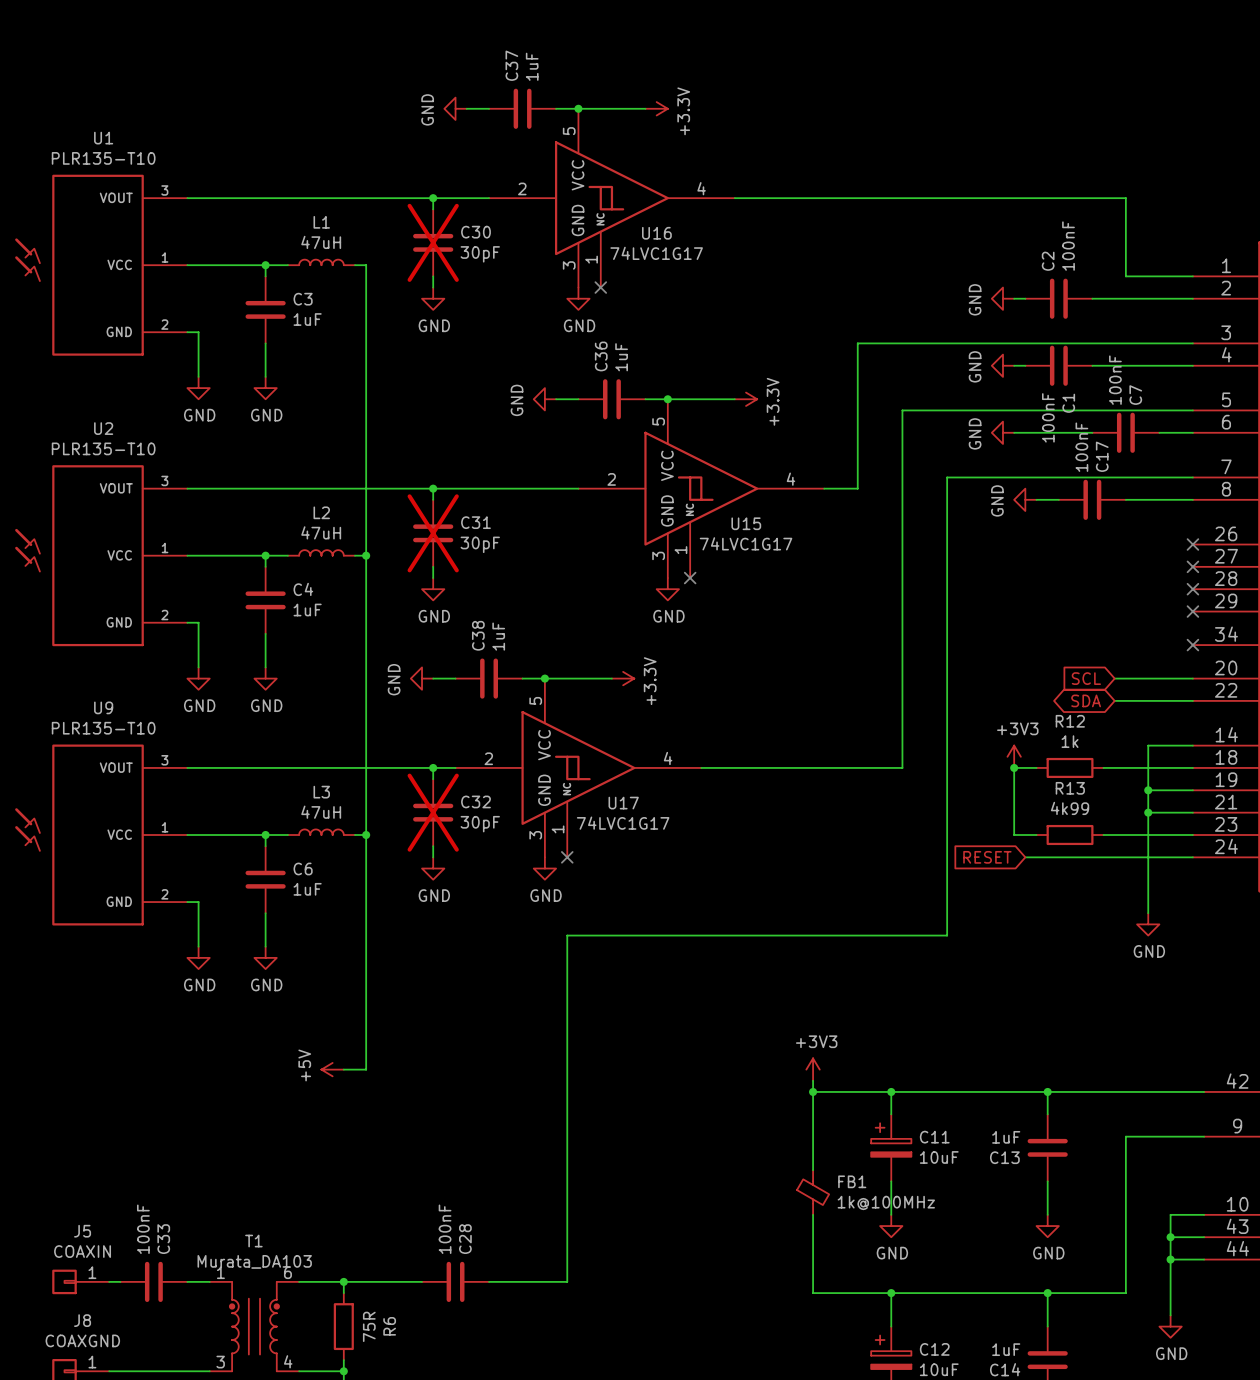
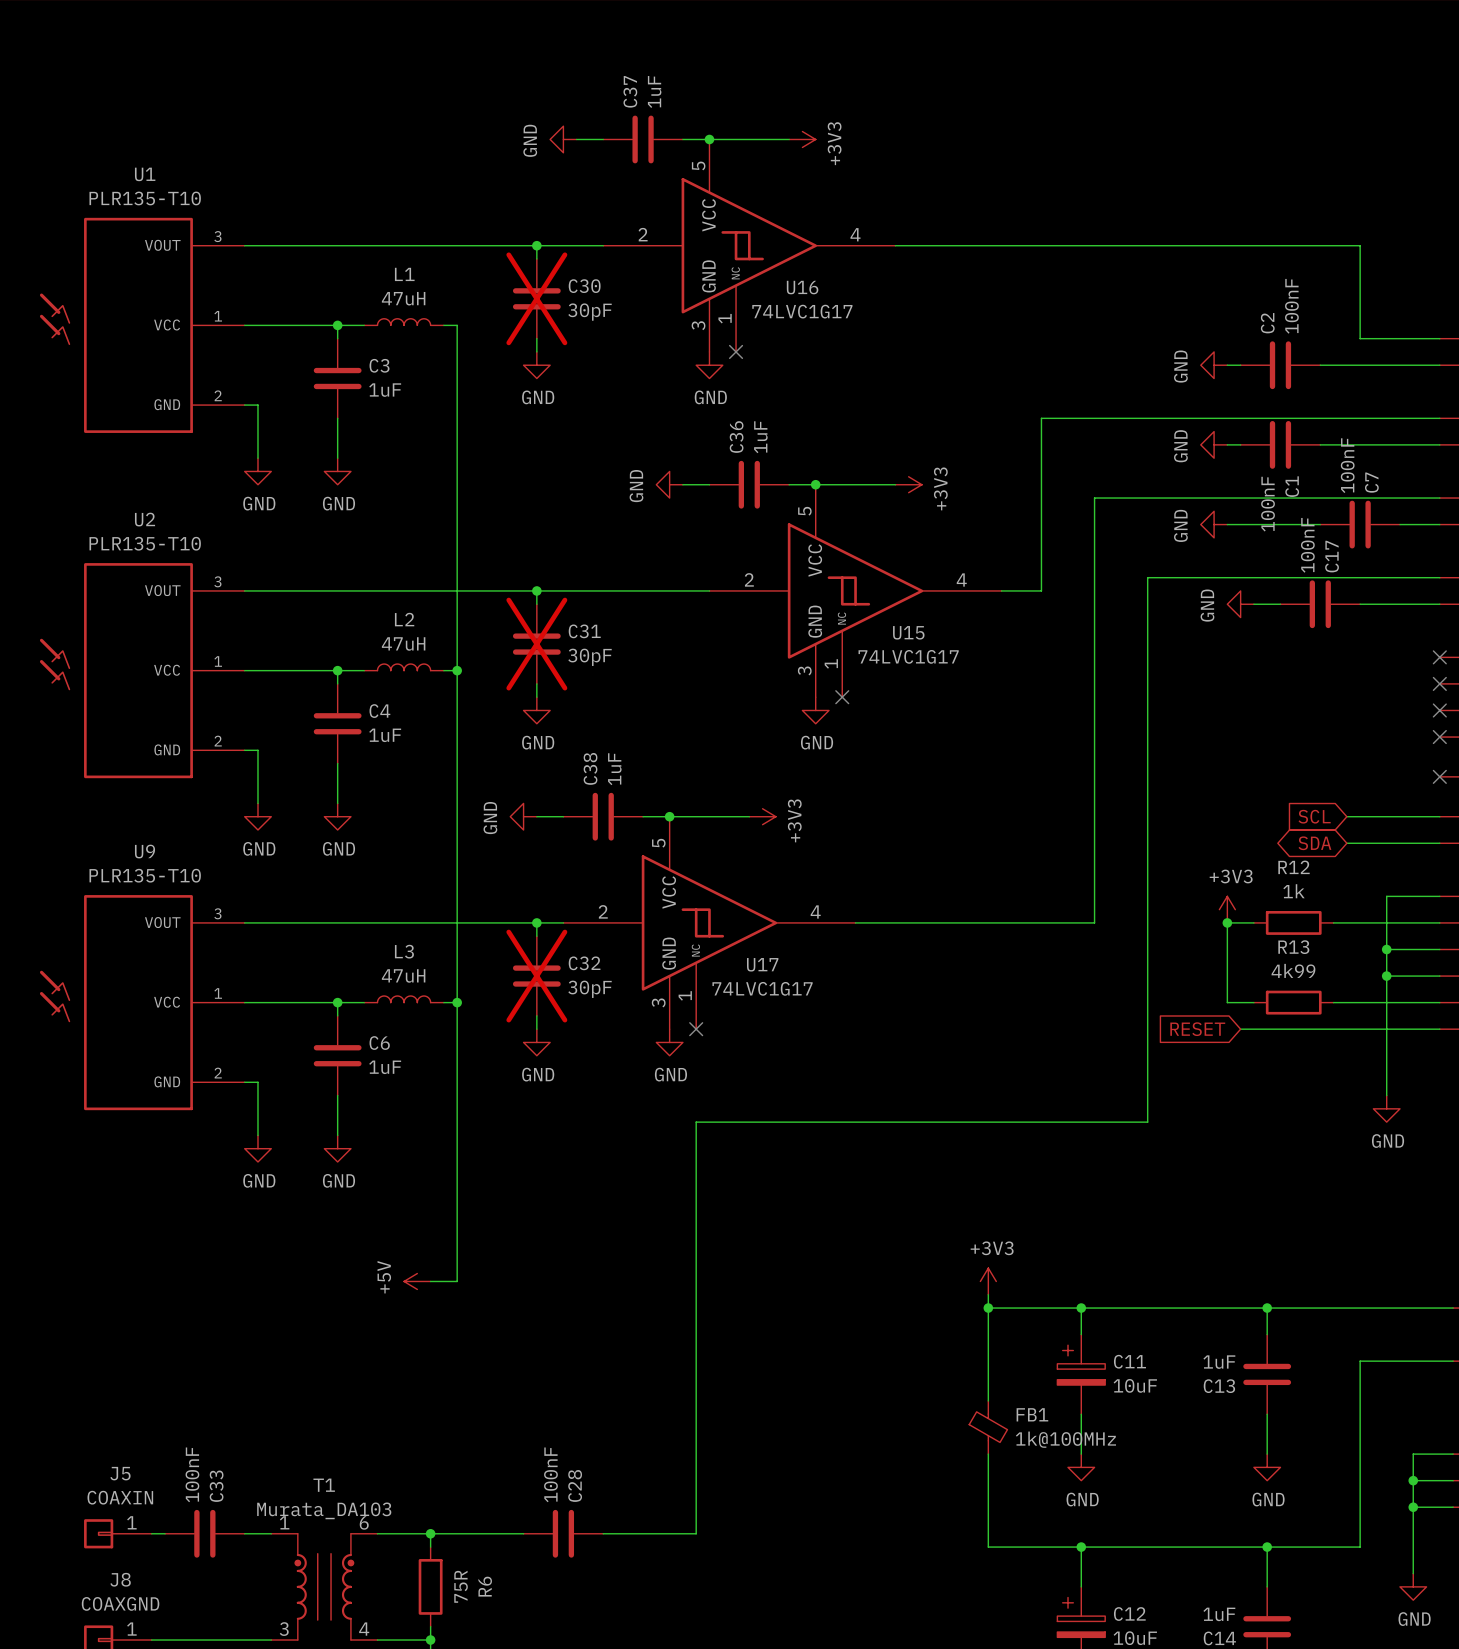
power symbol: +3.3V (656, 108) -> +3V3 (802, 139)
power symbol: +3.3V (746, 399) -> +3V3 (908, 484)
power symbol: +3.3V (623, 678) -> +3V3 (762, 816)

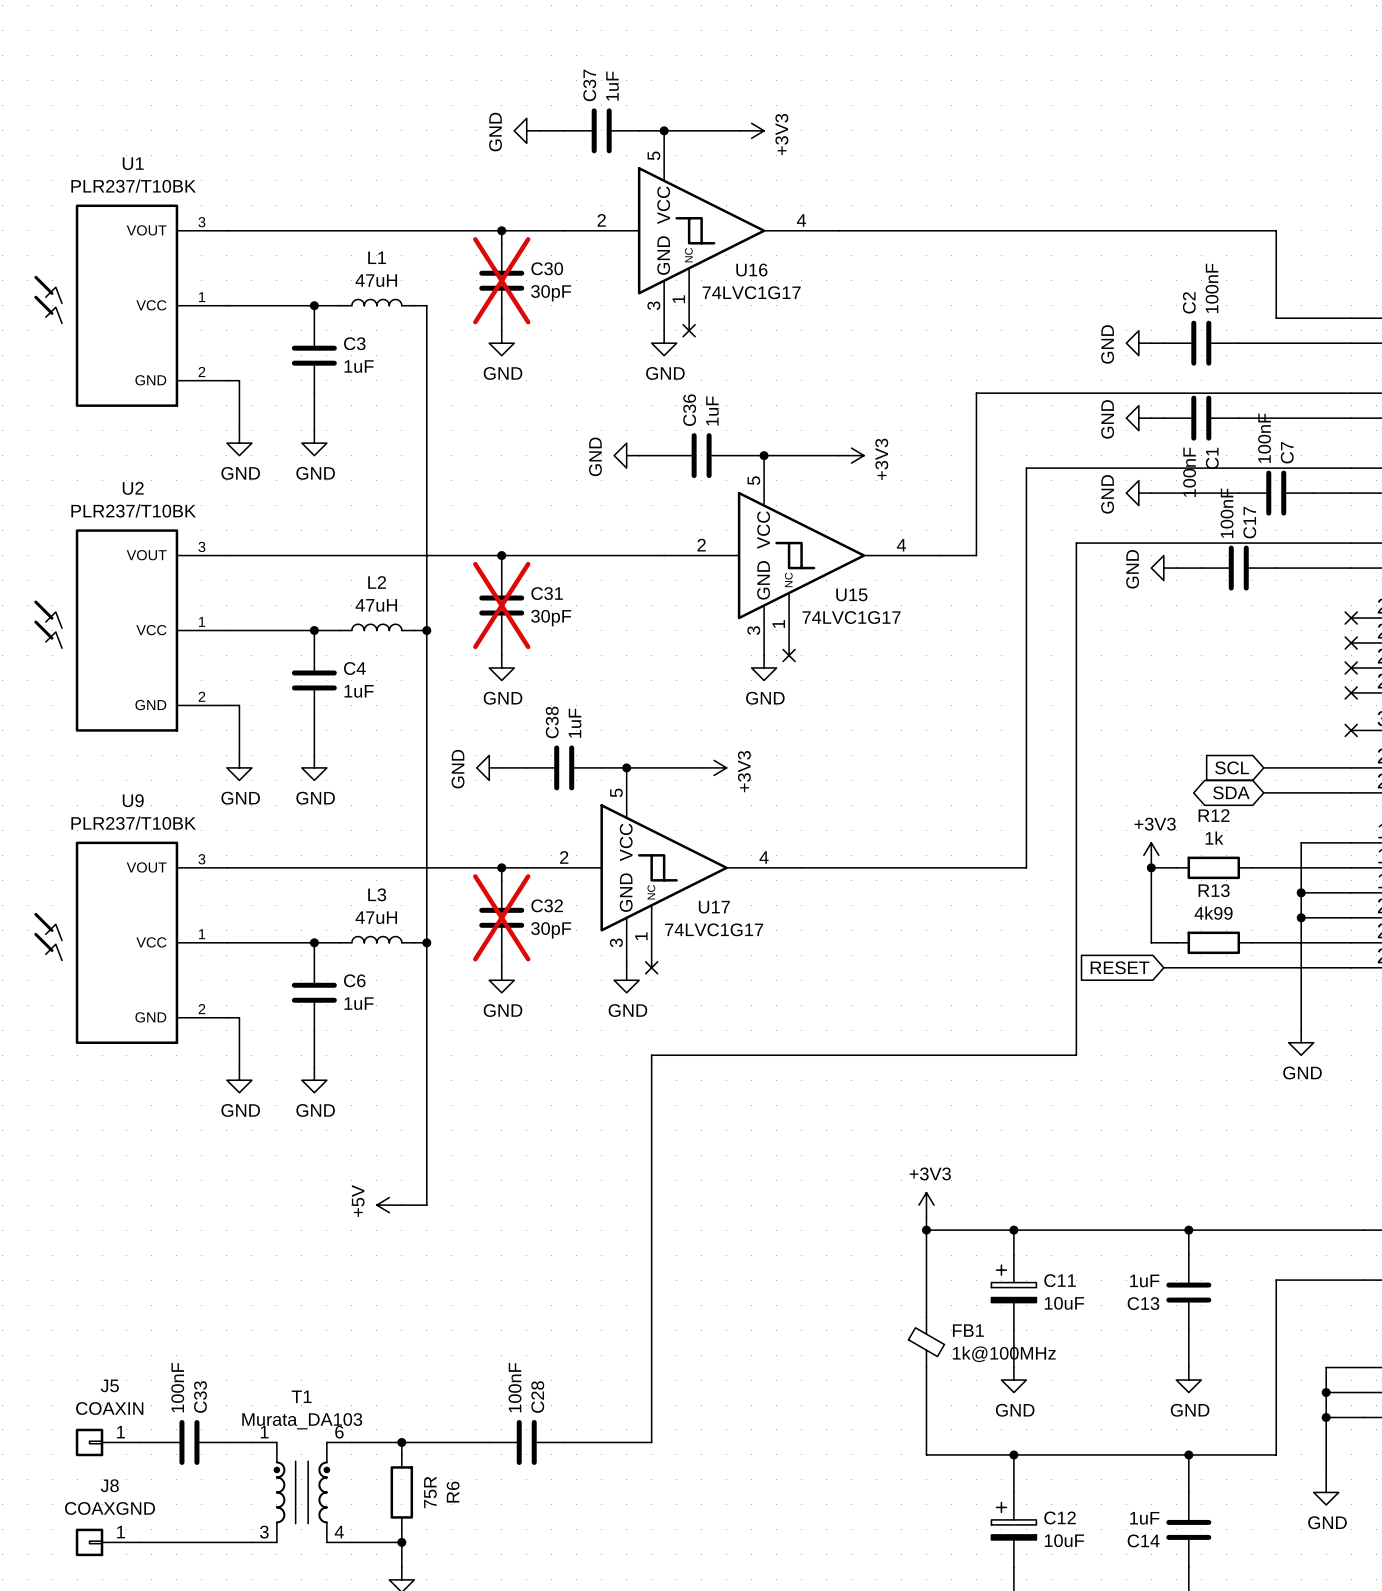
U1 value: PLR135-T10 (145, 198) -> PLR237/T10BK (133, 186)
U2 value: PLR135-T10 (145, 543) -> PLR237/T10BK (133, 510)
U9 value: PLR135-T10 (145, 875) -> PLR237/T10BK (133, 823)

